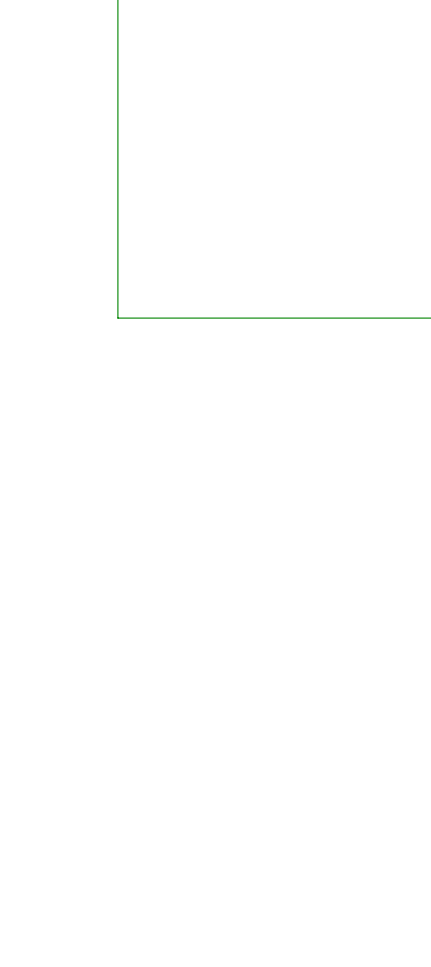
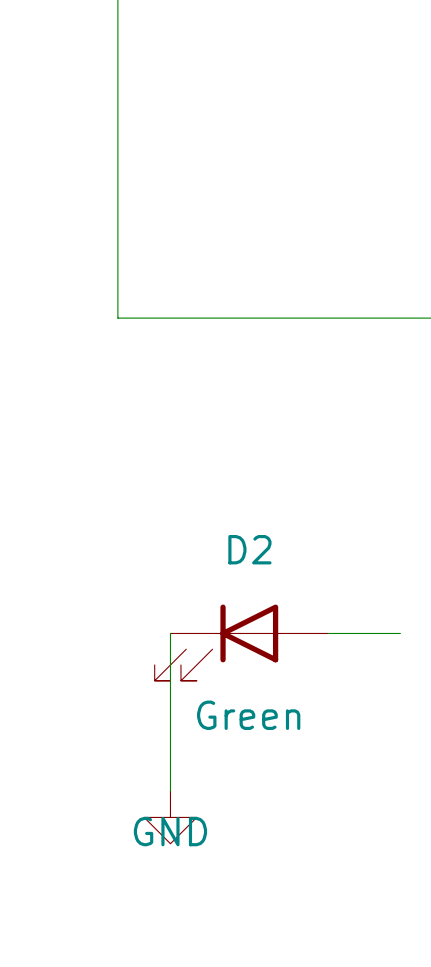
wire: none -> (170, 633) (170, 791)
wire: none -> (328, 633) (400, 633)
D2: none -> Green (241, 642)
power symbol: none -> GND (170, 817)

